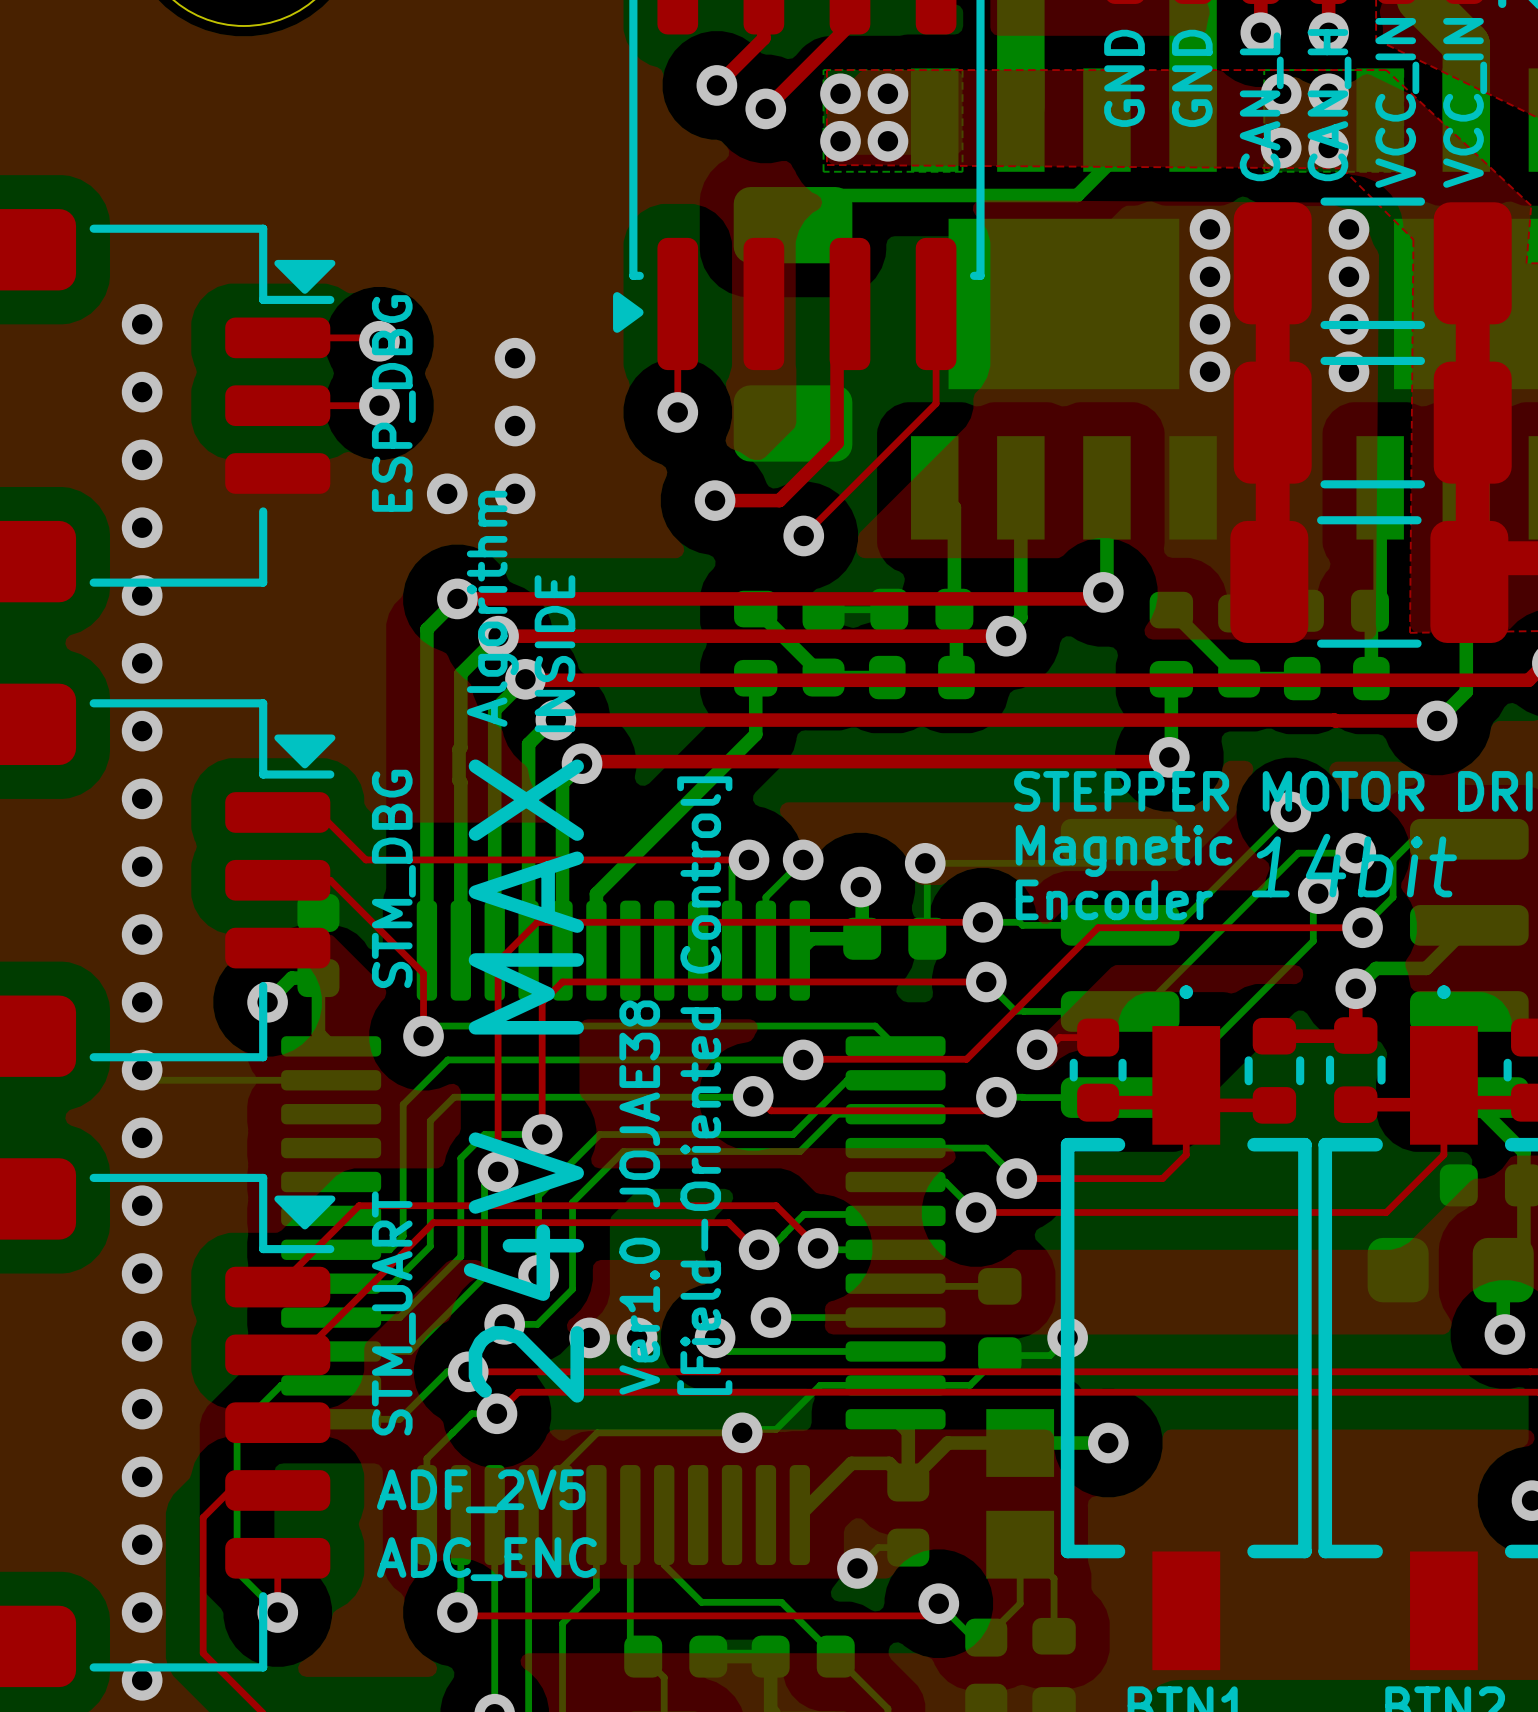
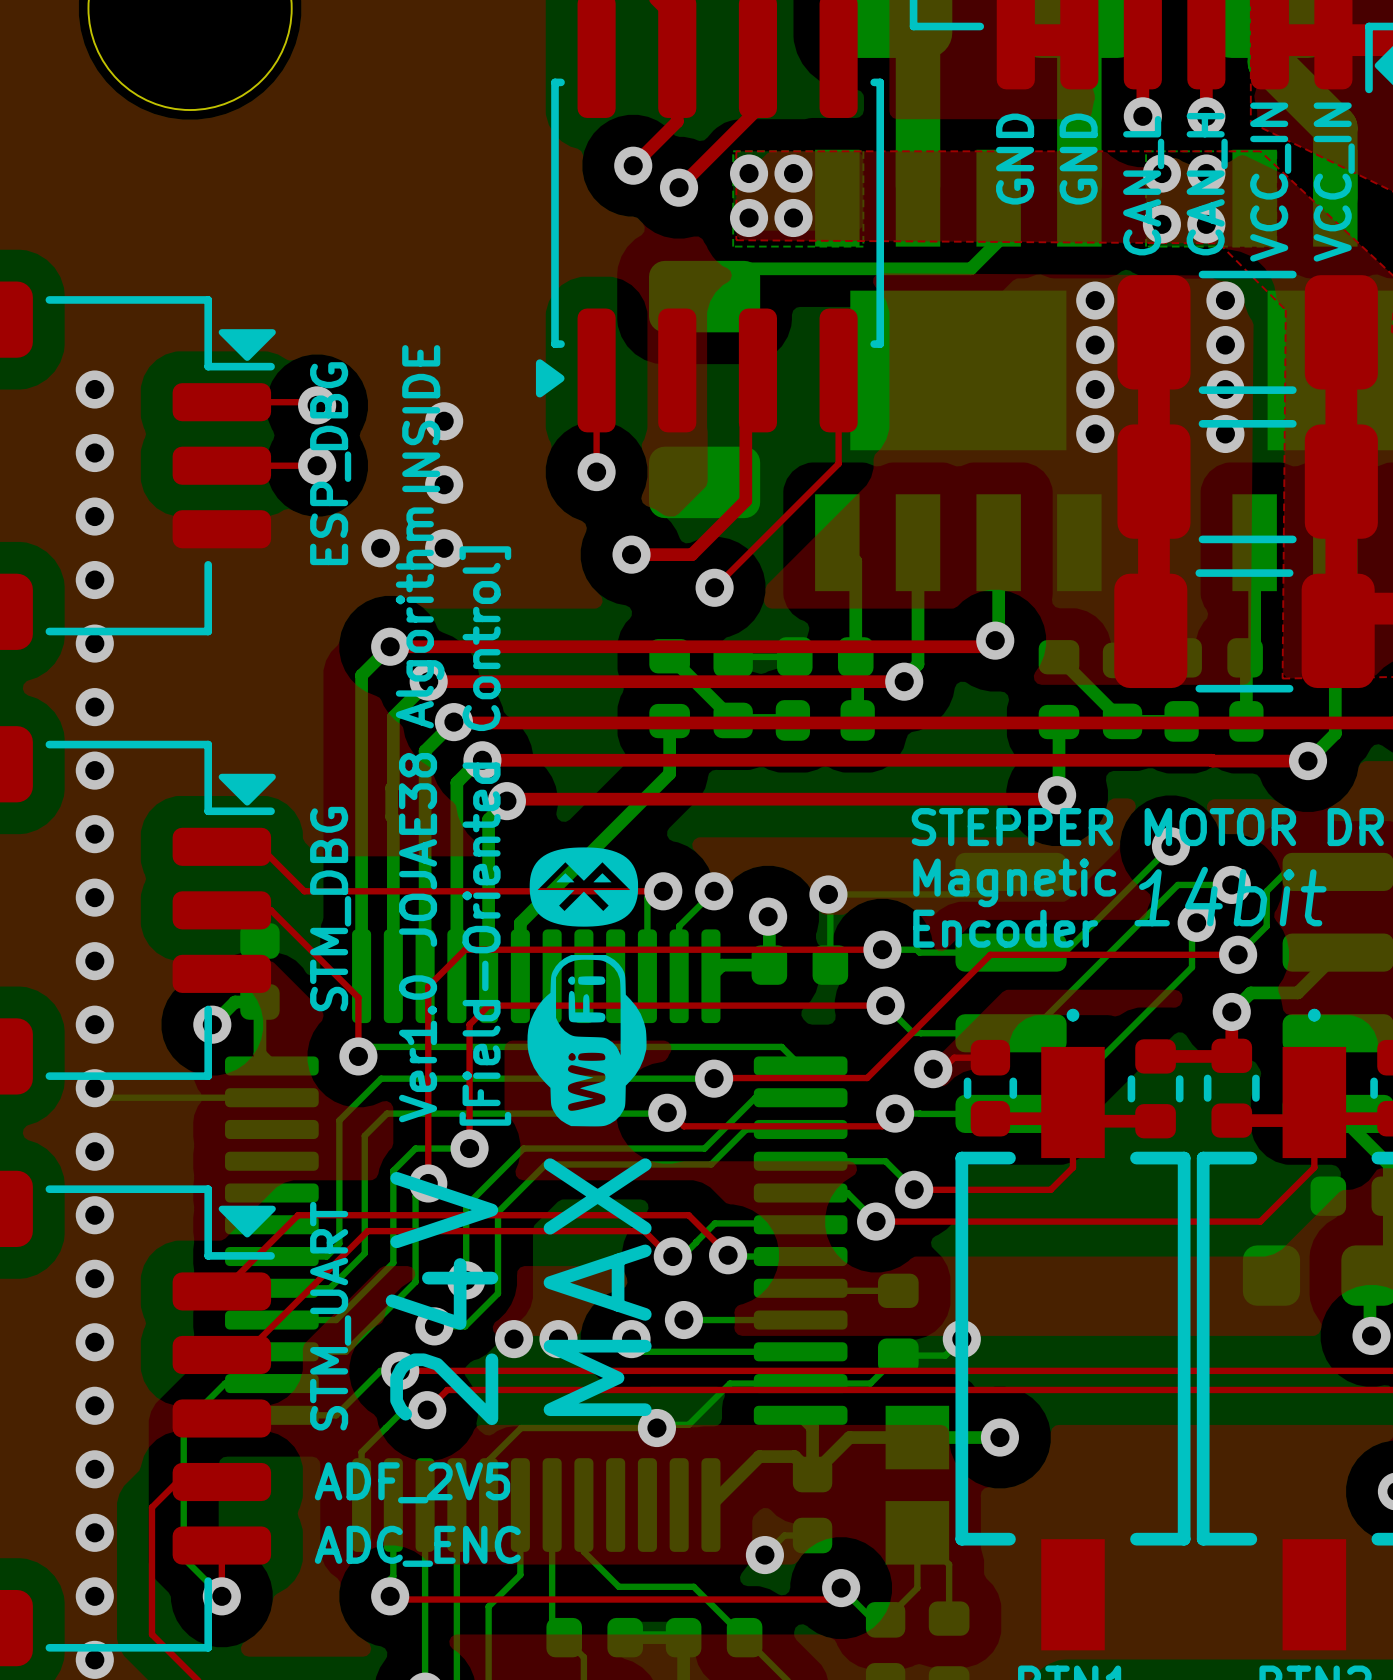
text position: Algorithm (492, 608) -> Algorithm (420, 617)
text position: INSIDE (554, 653) -> INSIDE (421, 418)
text: none -> [Field-Oriented Control] (485, 836)
drawing: none -> [527, 847, 647, 1127]
text: 24V MAX (523, 1081) -> 24V (441, 1298)
text: [Field-Oriented Control] (704, 1085) -> MAX (597, 1287)
text position: Ver1.0 JOJAE38 (639, 1197) -> Ver1.0 JOJAE38 (418, 937)

